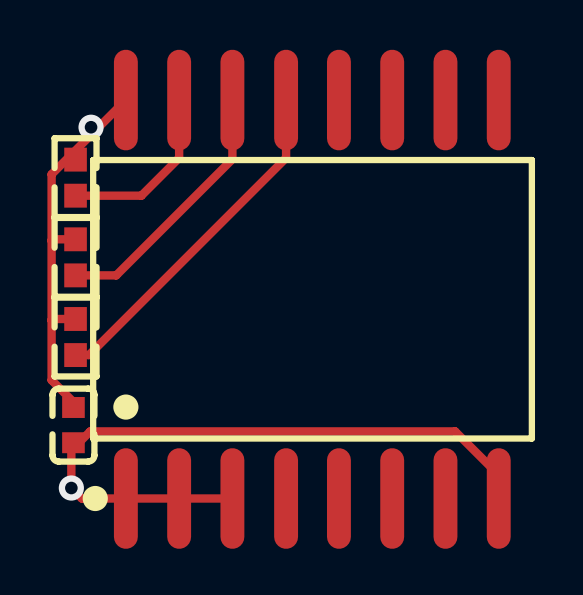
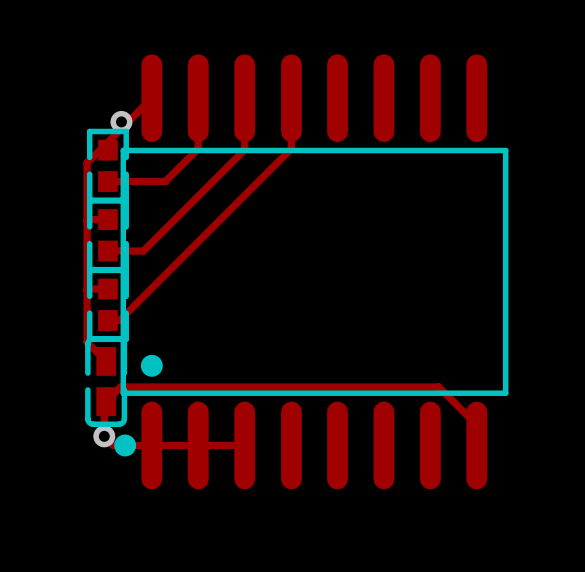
part footprint: [49, 385, 98, 465] -> [85, 336, 128, 428]

